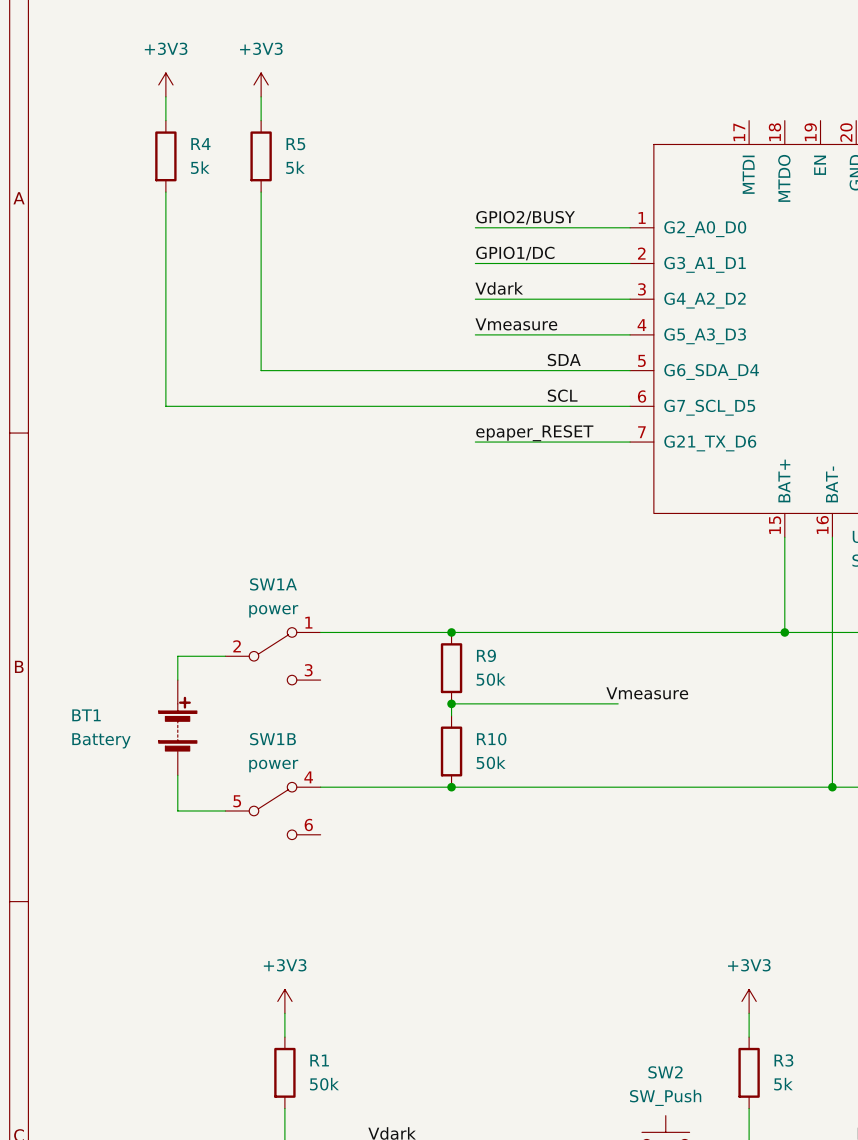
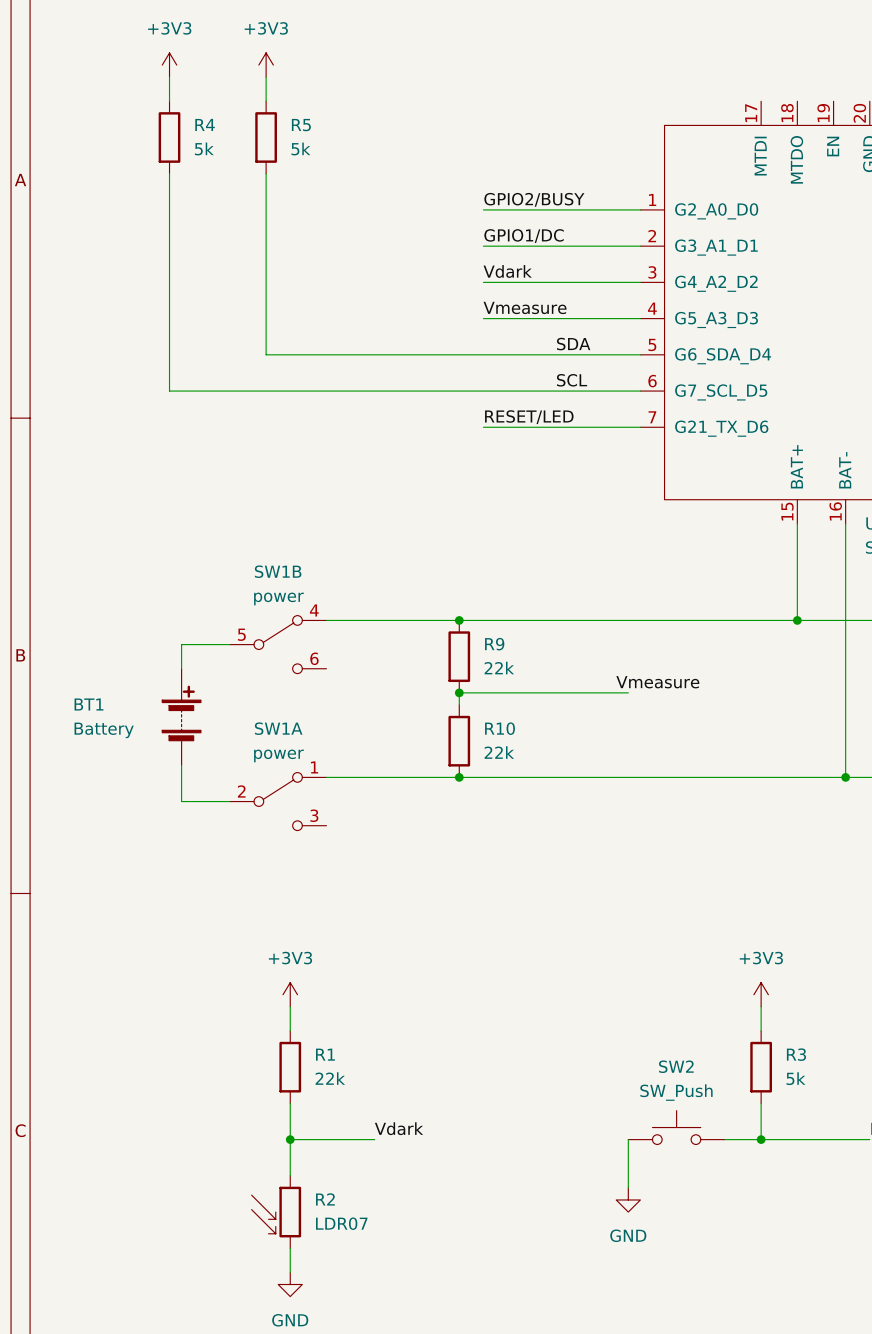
label: epaper_RESET (534, 433) -> RESET/LED (529, 417)
SW1A position: (273, 656) -> (278, 801)
R9 value: 50k (491, 679) -> 22k (499, 668)
R10 value: 50k (491, 762) -> 22k (499, 752)
SW1B position: (273, 810) -> (278, 644)
R1 value: 50k (324, 1084) -> 22k (330, 1078)

